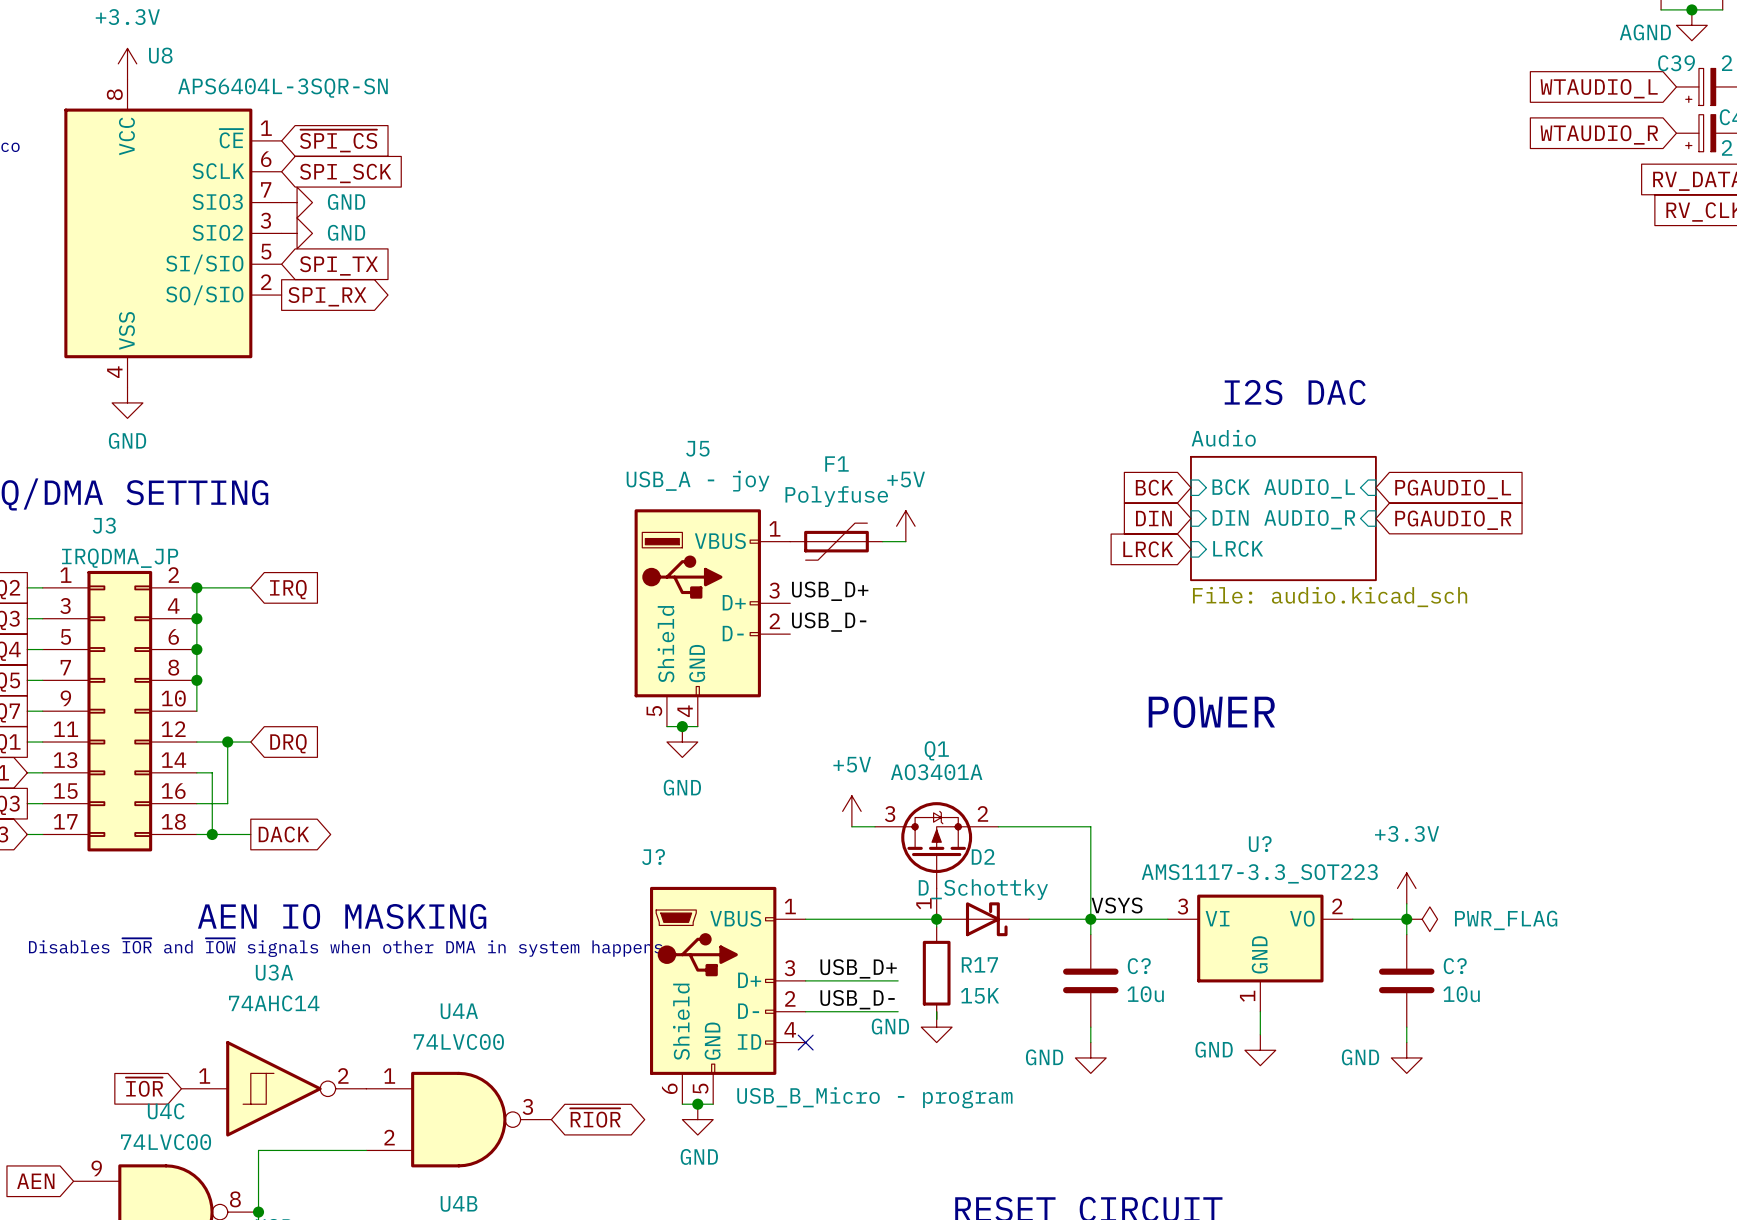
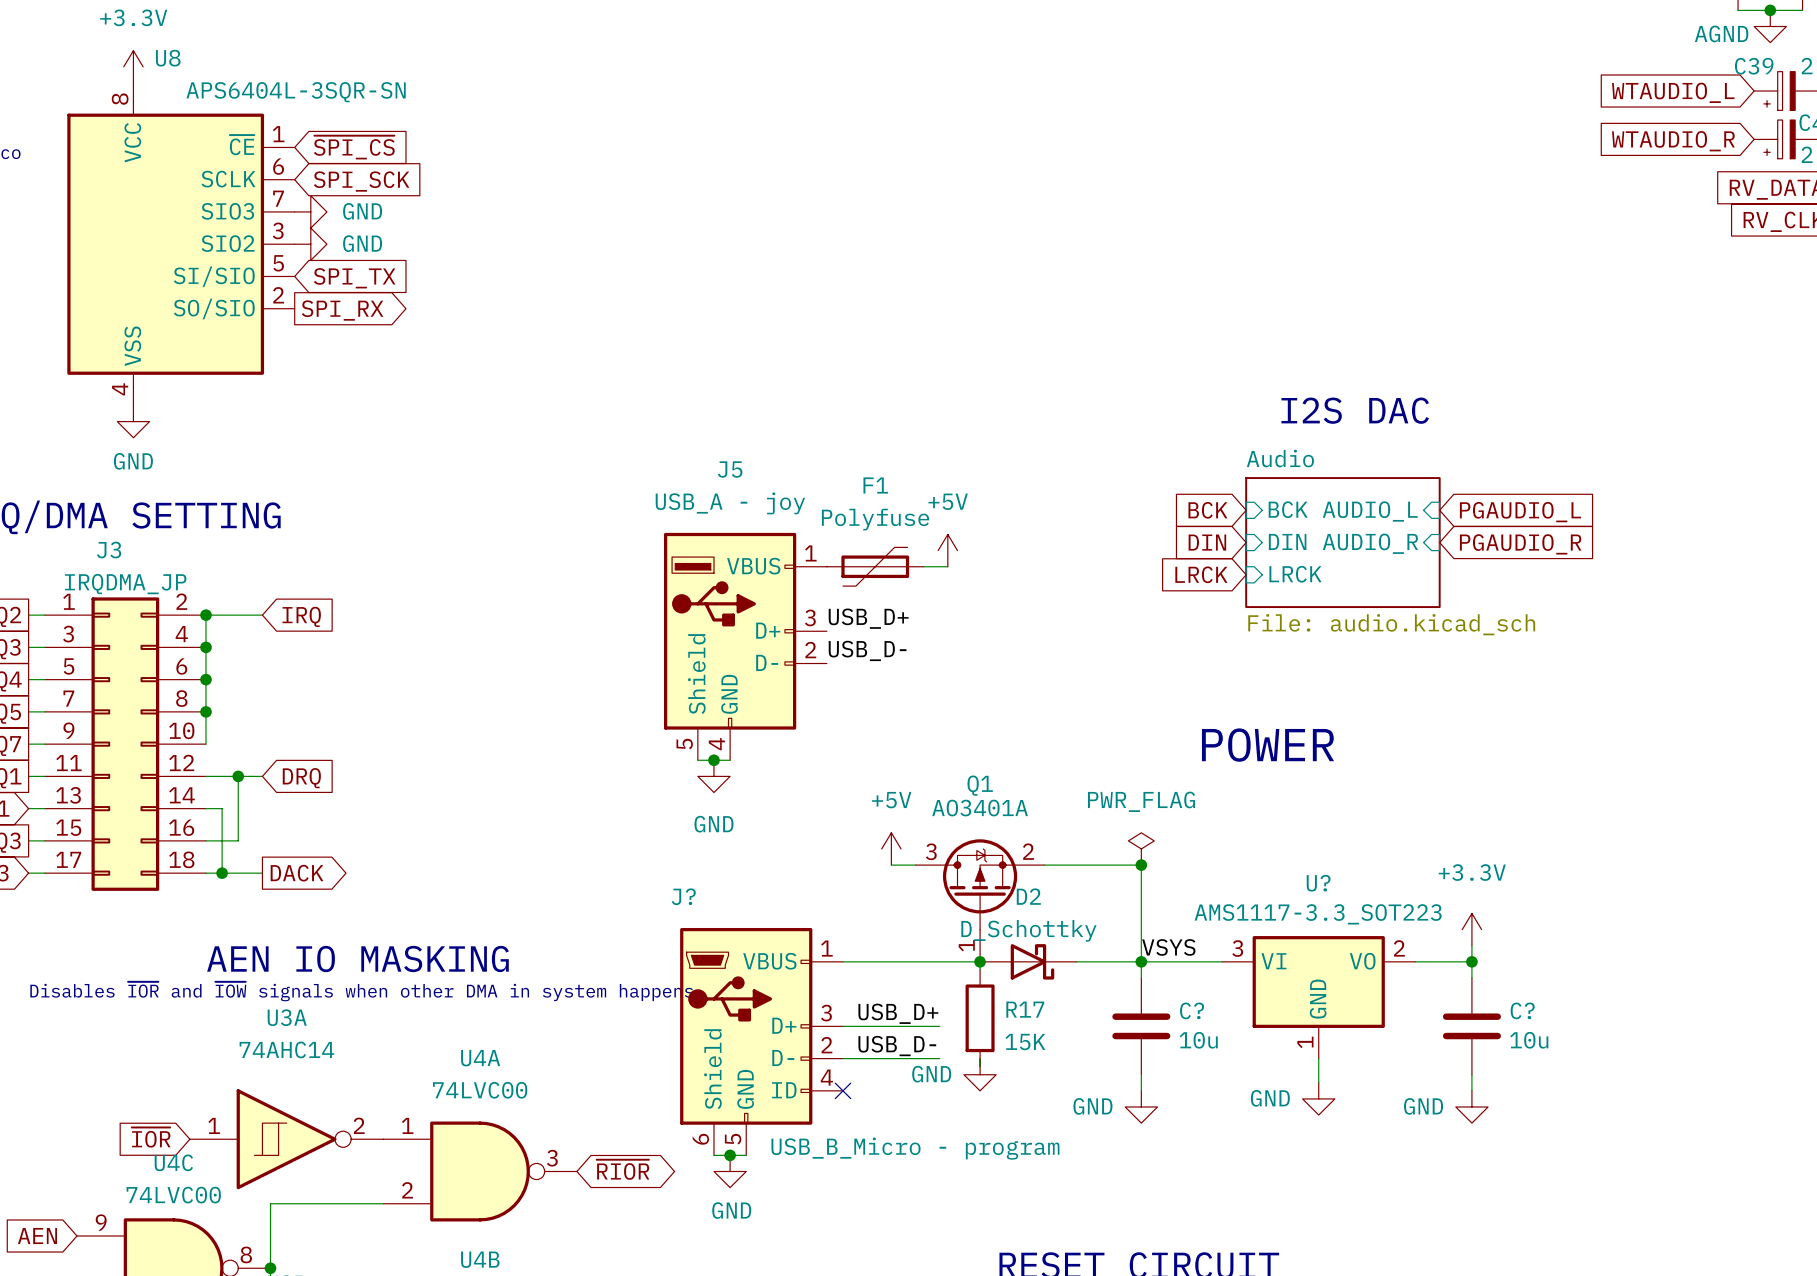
power symbol: none -> PWR_FLAG (1141, 848)
junction: none -> (1141, 865)
power symbol: PWR_FLAG (1422, 919) -> none

